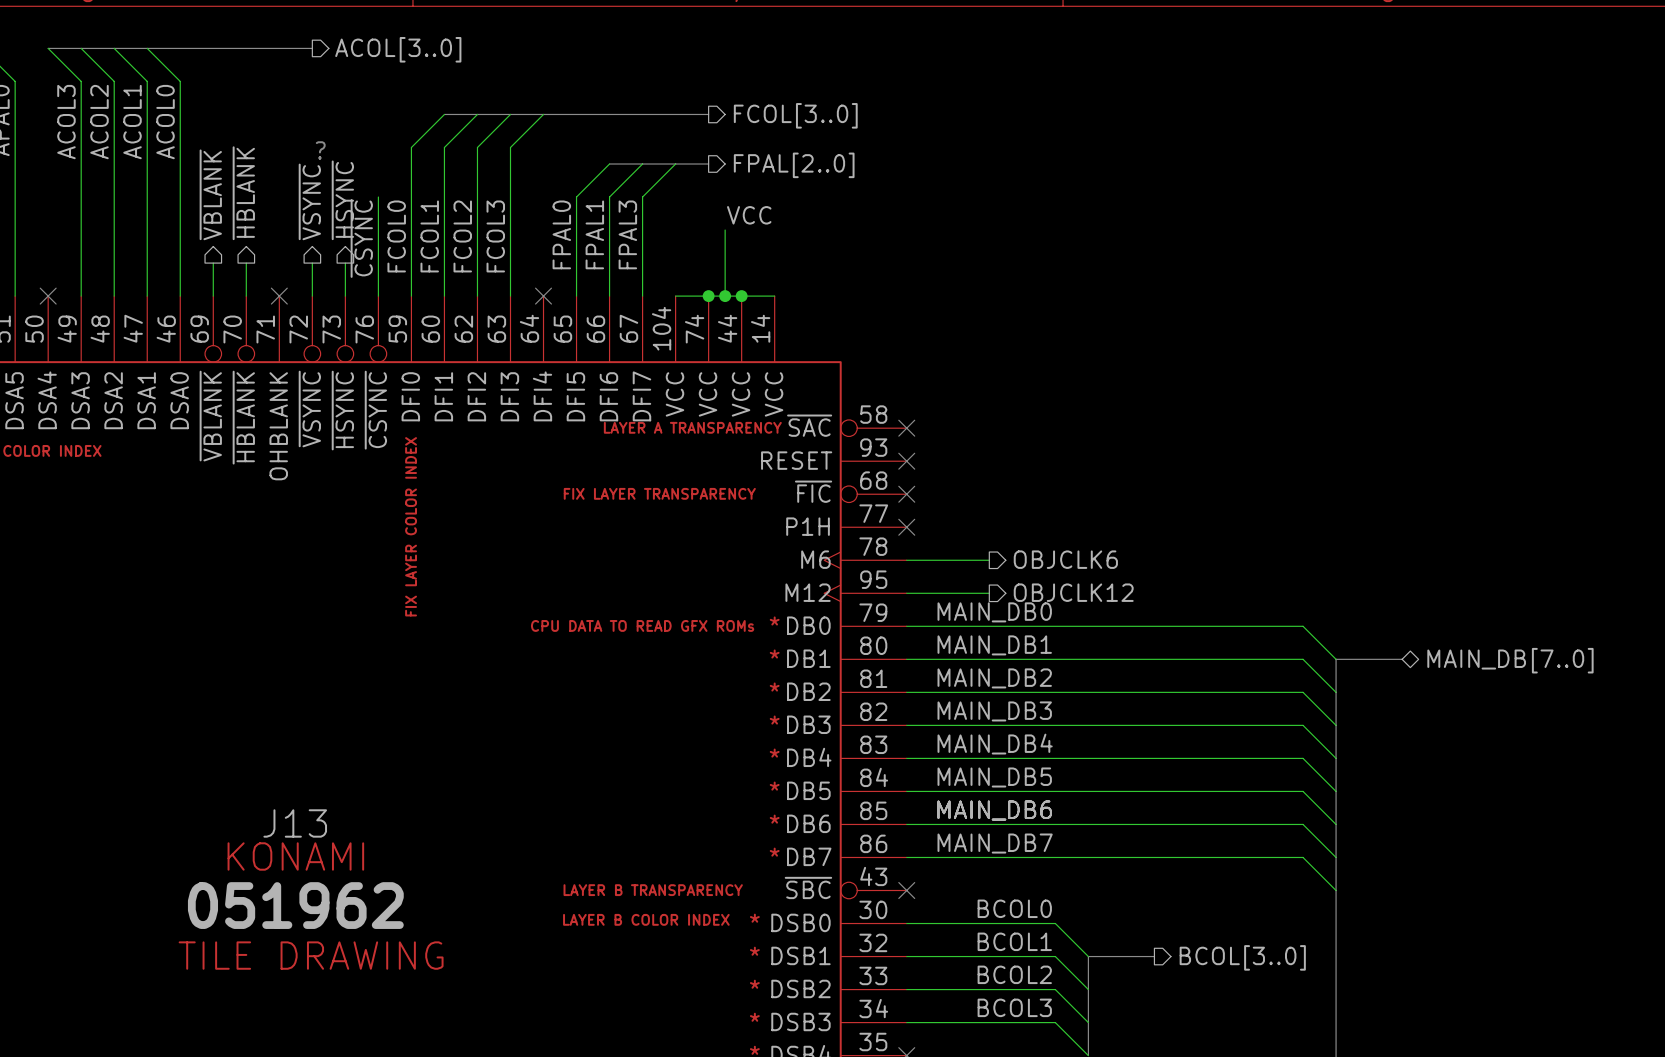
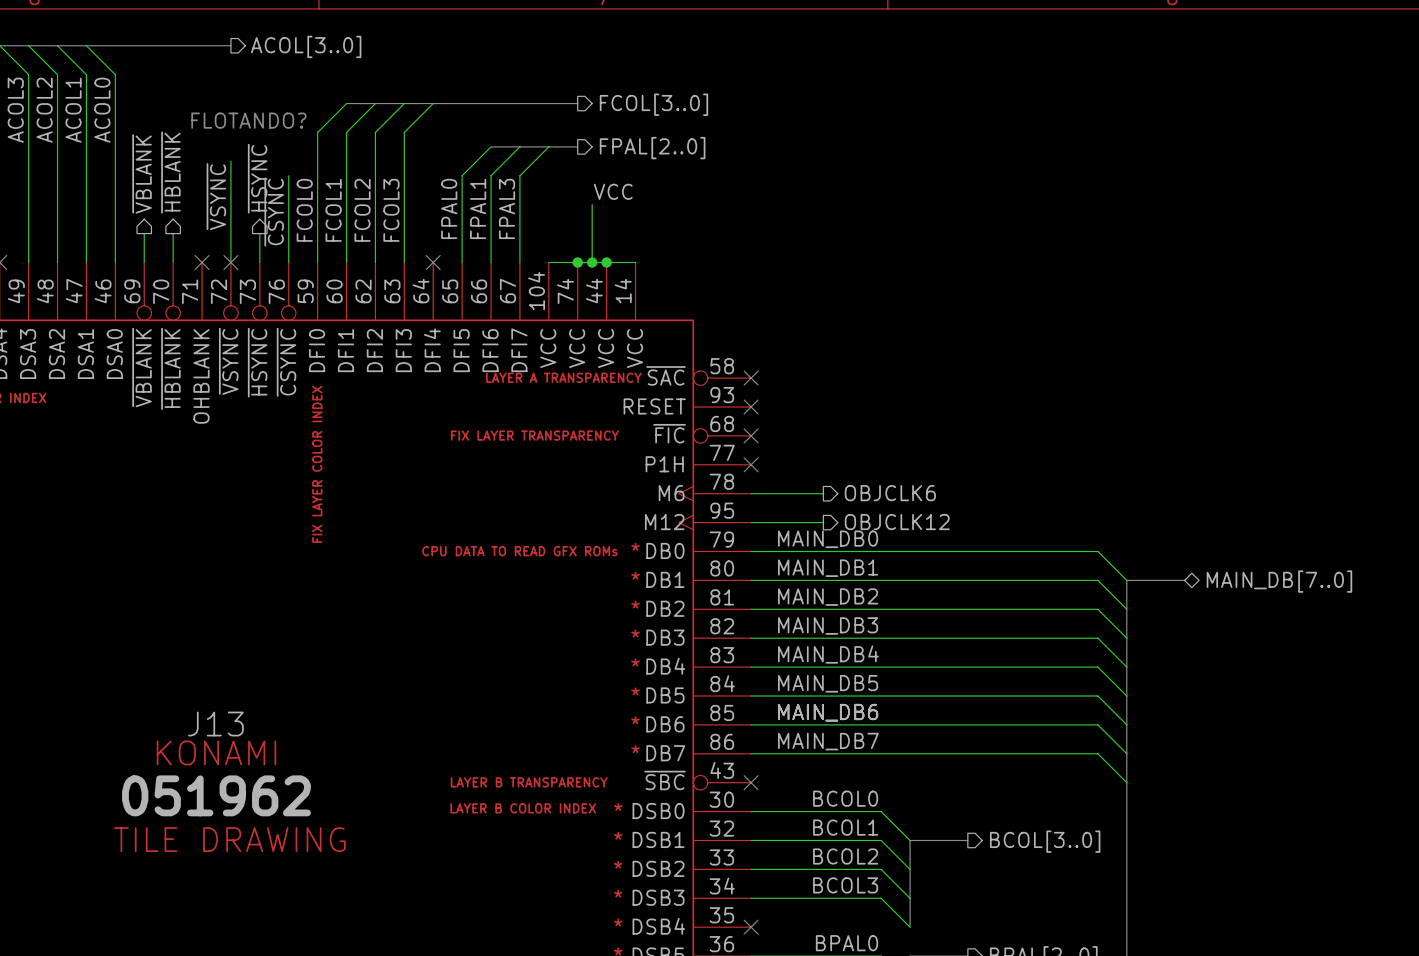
text: none -> FLOTANDO? (248, 120)
text: ? (320, 150) -> none
wire: none -> (230, 161) (230, 233)
hierarchical label: ~{VSYNC} (309, 201) -> none
label: none -> ~{VSYNC} (216, 196)
no-connect mark: none -> (230, 262)

